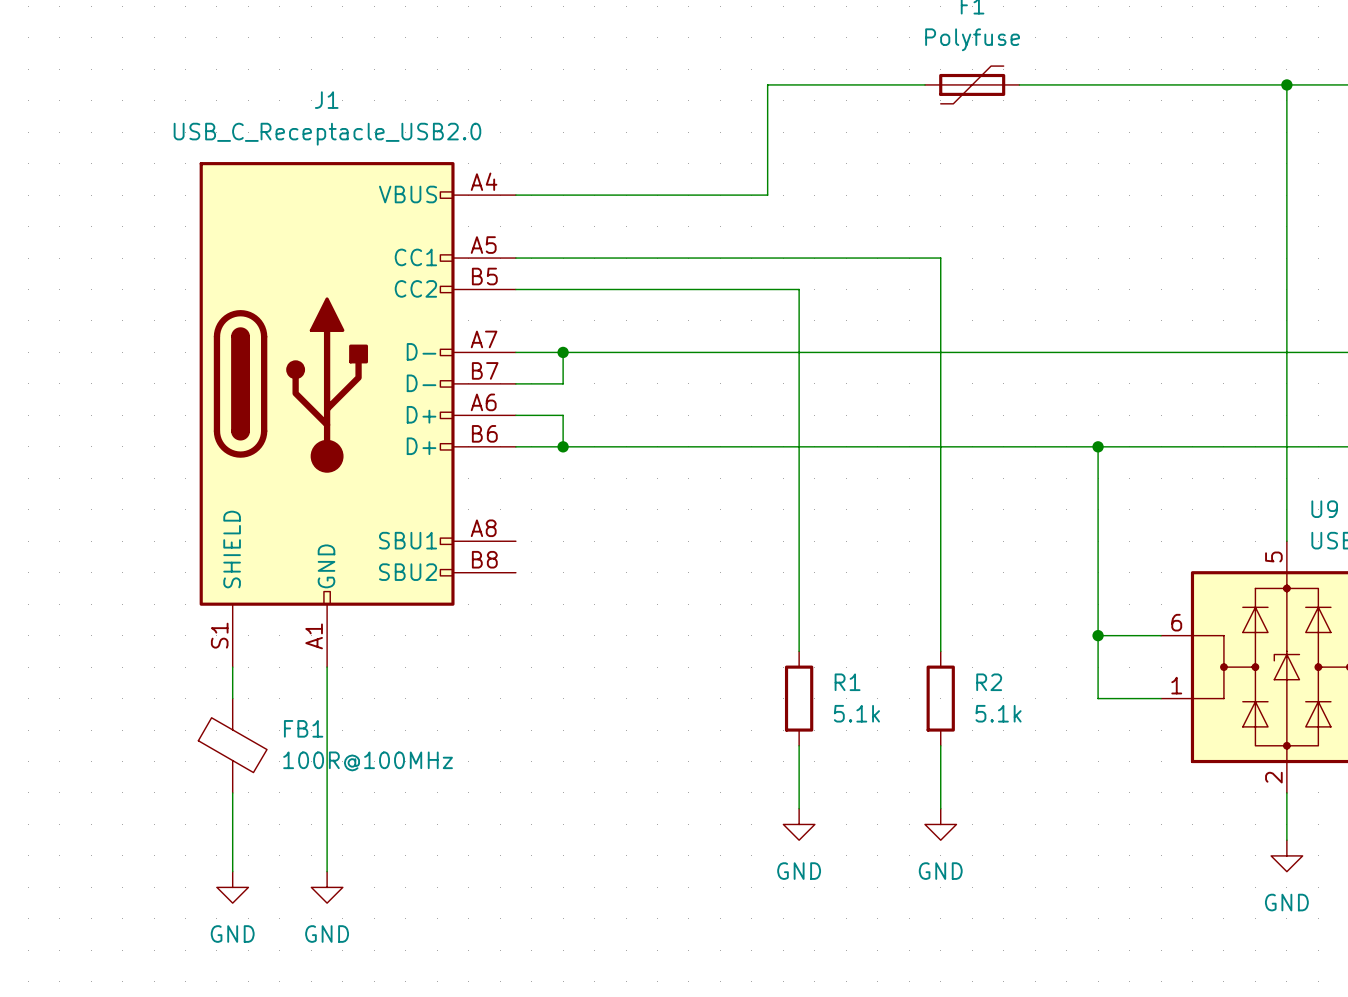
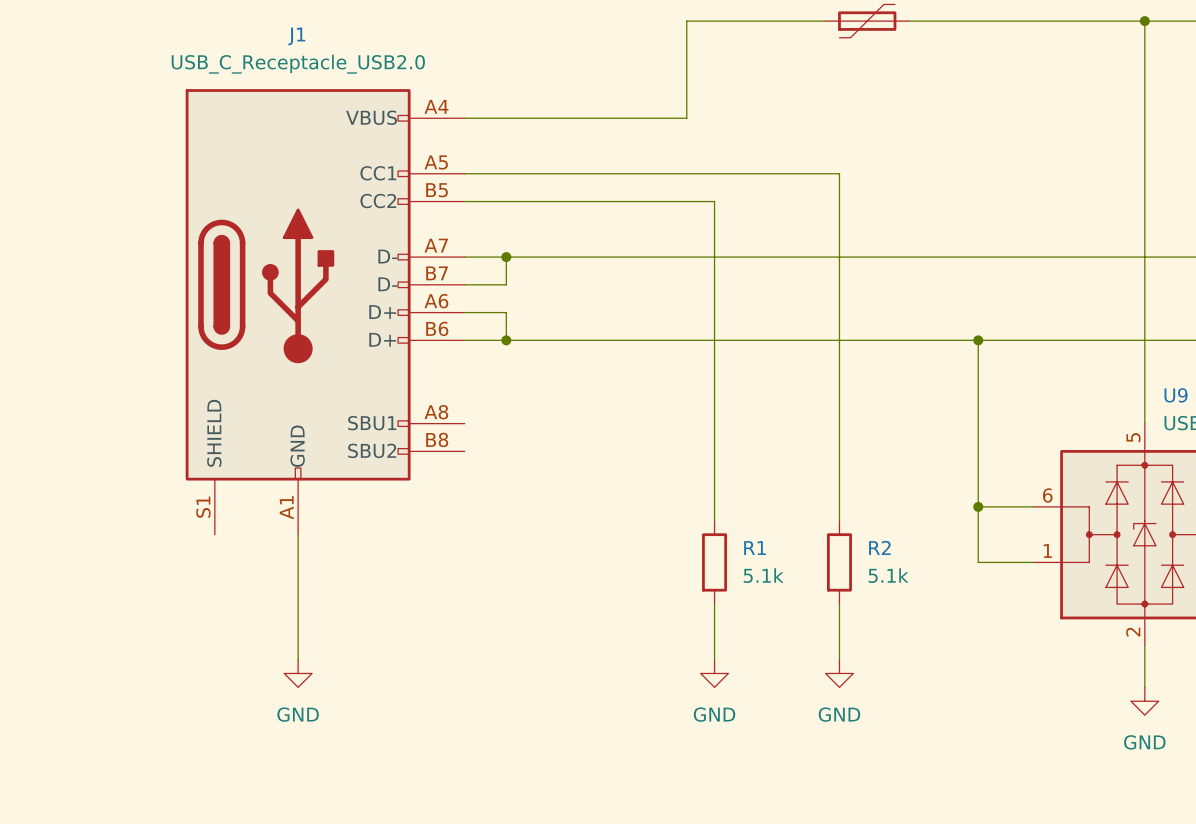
wire: (232, 667) (232, 698) -> none
FB1: 100R@100MHz (232, 745) -> none
wire: (232, 792) (232, 871) -> none
wire: (327, 808) (327, 871) -> none
power symbol: none -> GND (298, 673)
power symbol: GND (232, 887) -> none
power symbol: GND (327, 887) -> none

